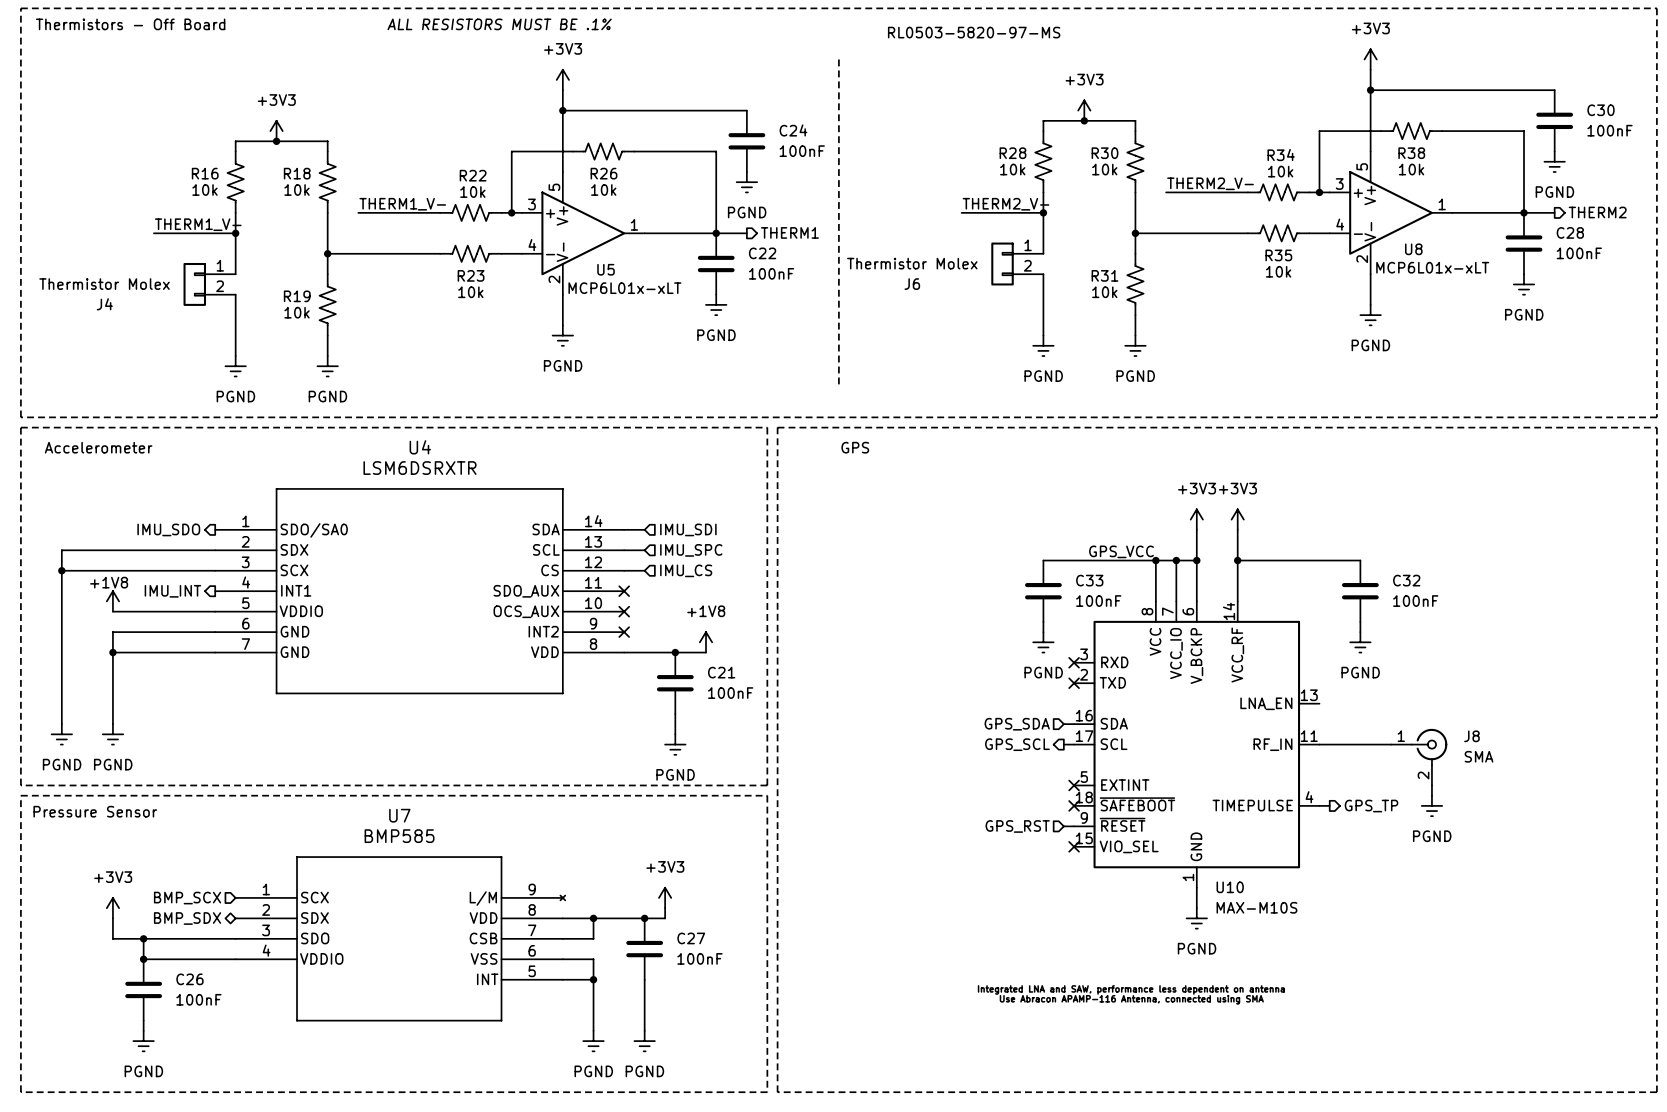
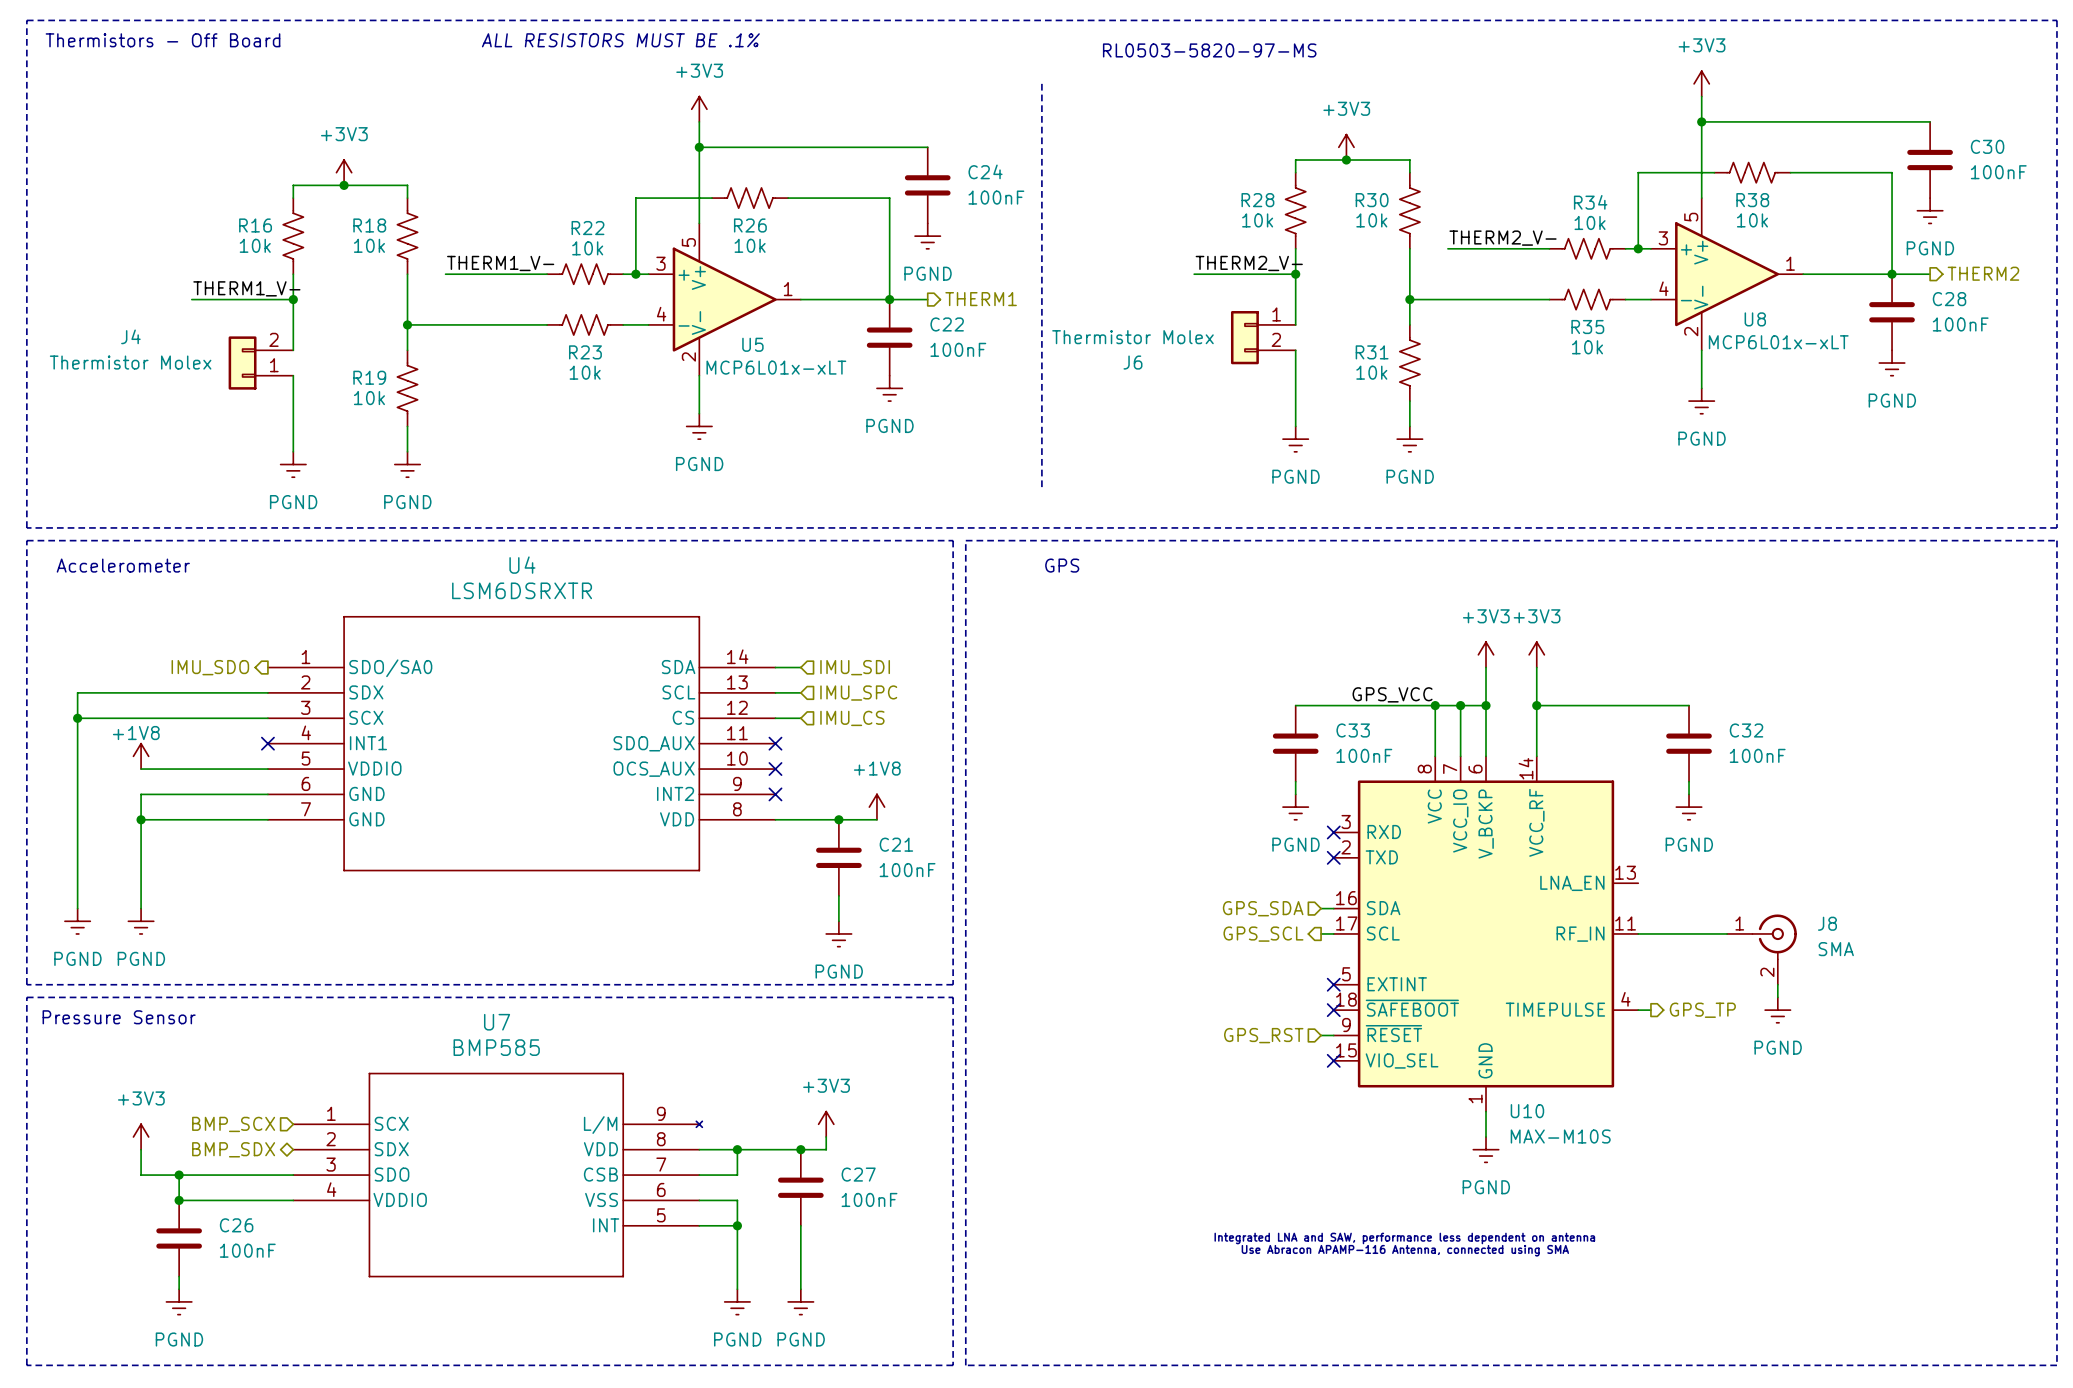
J4 flip: as is (194, 284) -> up-down (242, 363)
hierarchical label: IMU_INT (172, 591) -> none
no-connect mark: none -> (267, 743)

